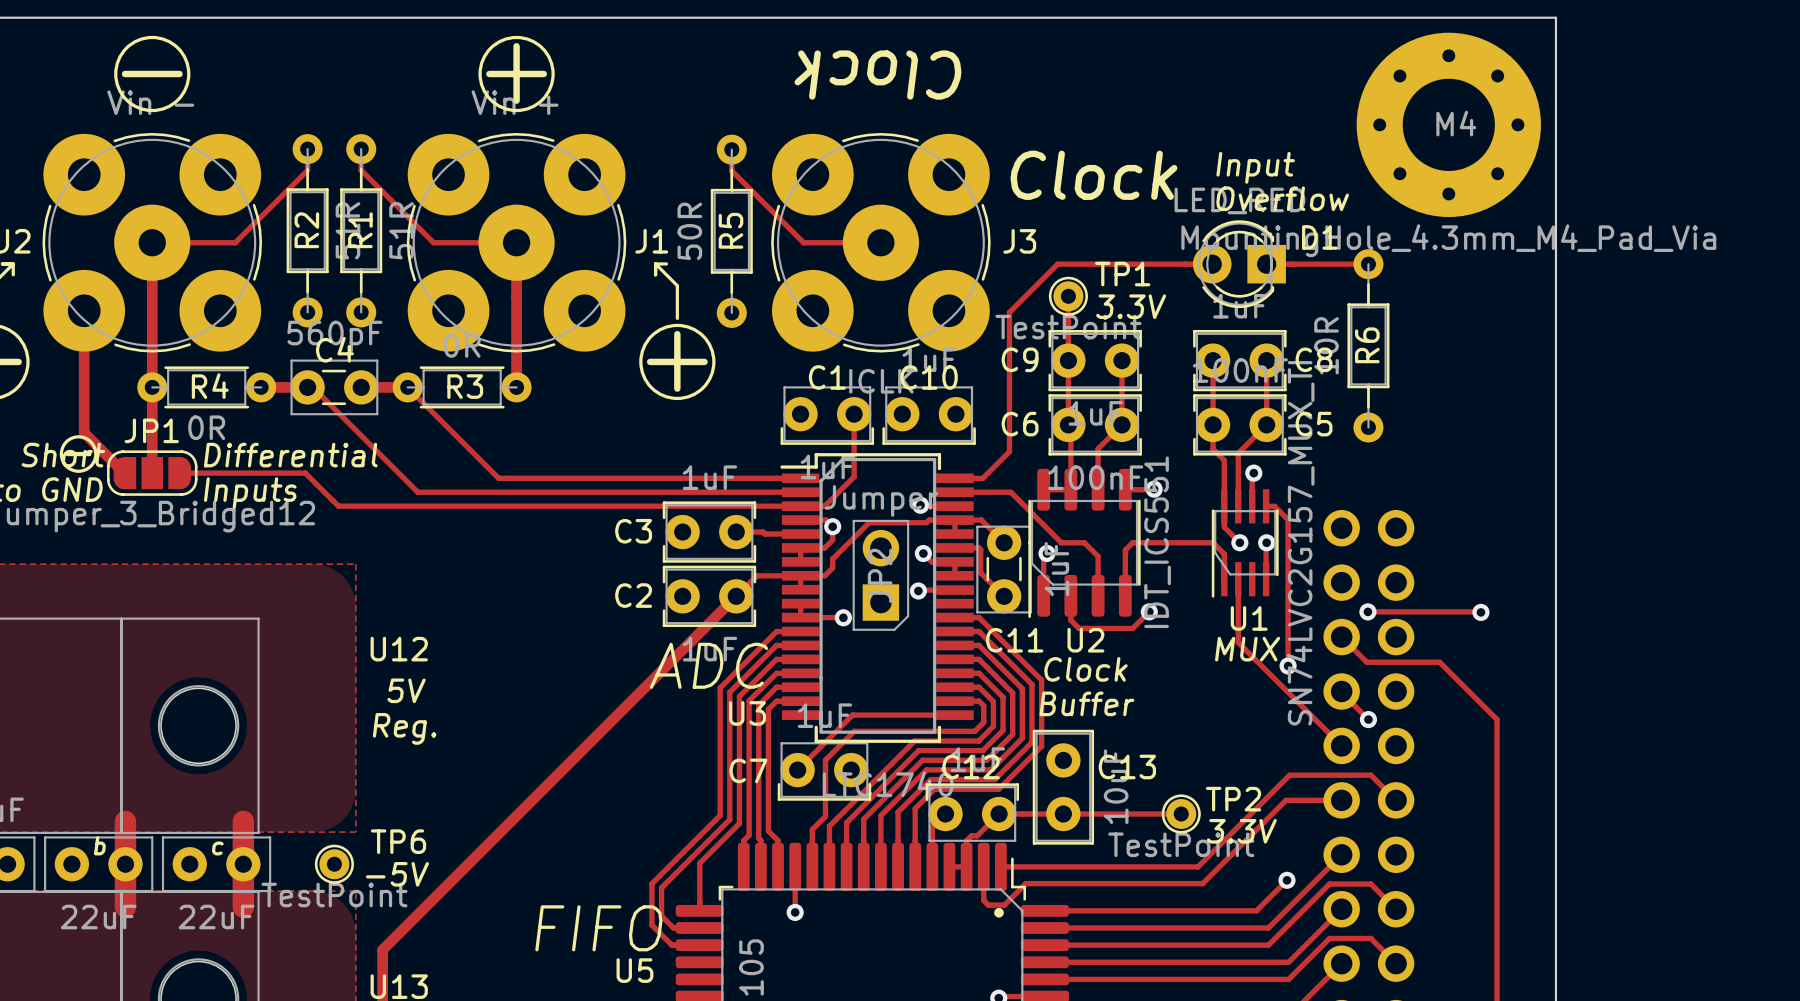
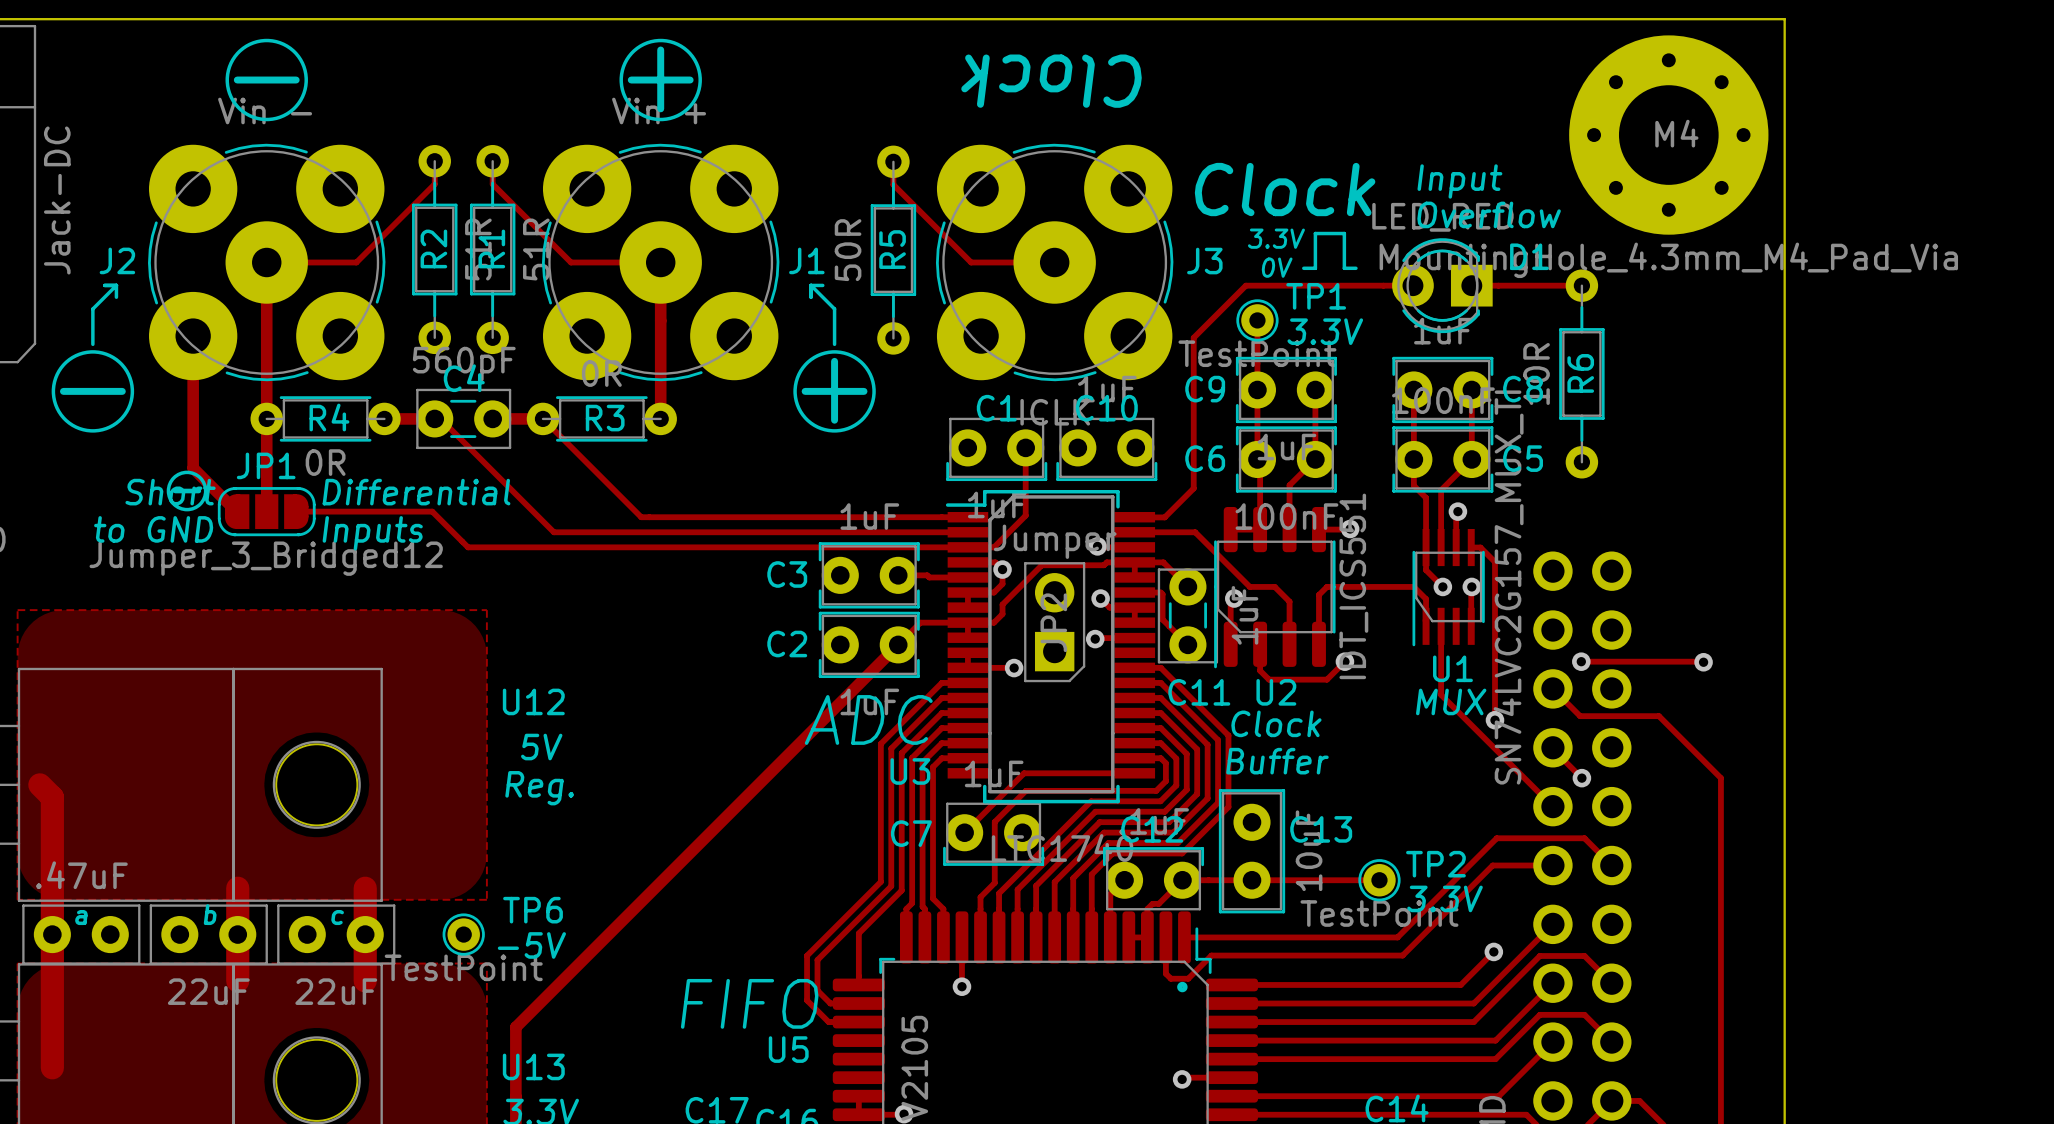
text: none -> 3.3V (1276, 238)
text: none -> 0V (1277, 267)
line: none -> (1303, 268) (1315, 268) (1315, 233) (1344, 233) (1344, 268) (1355, 268)

